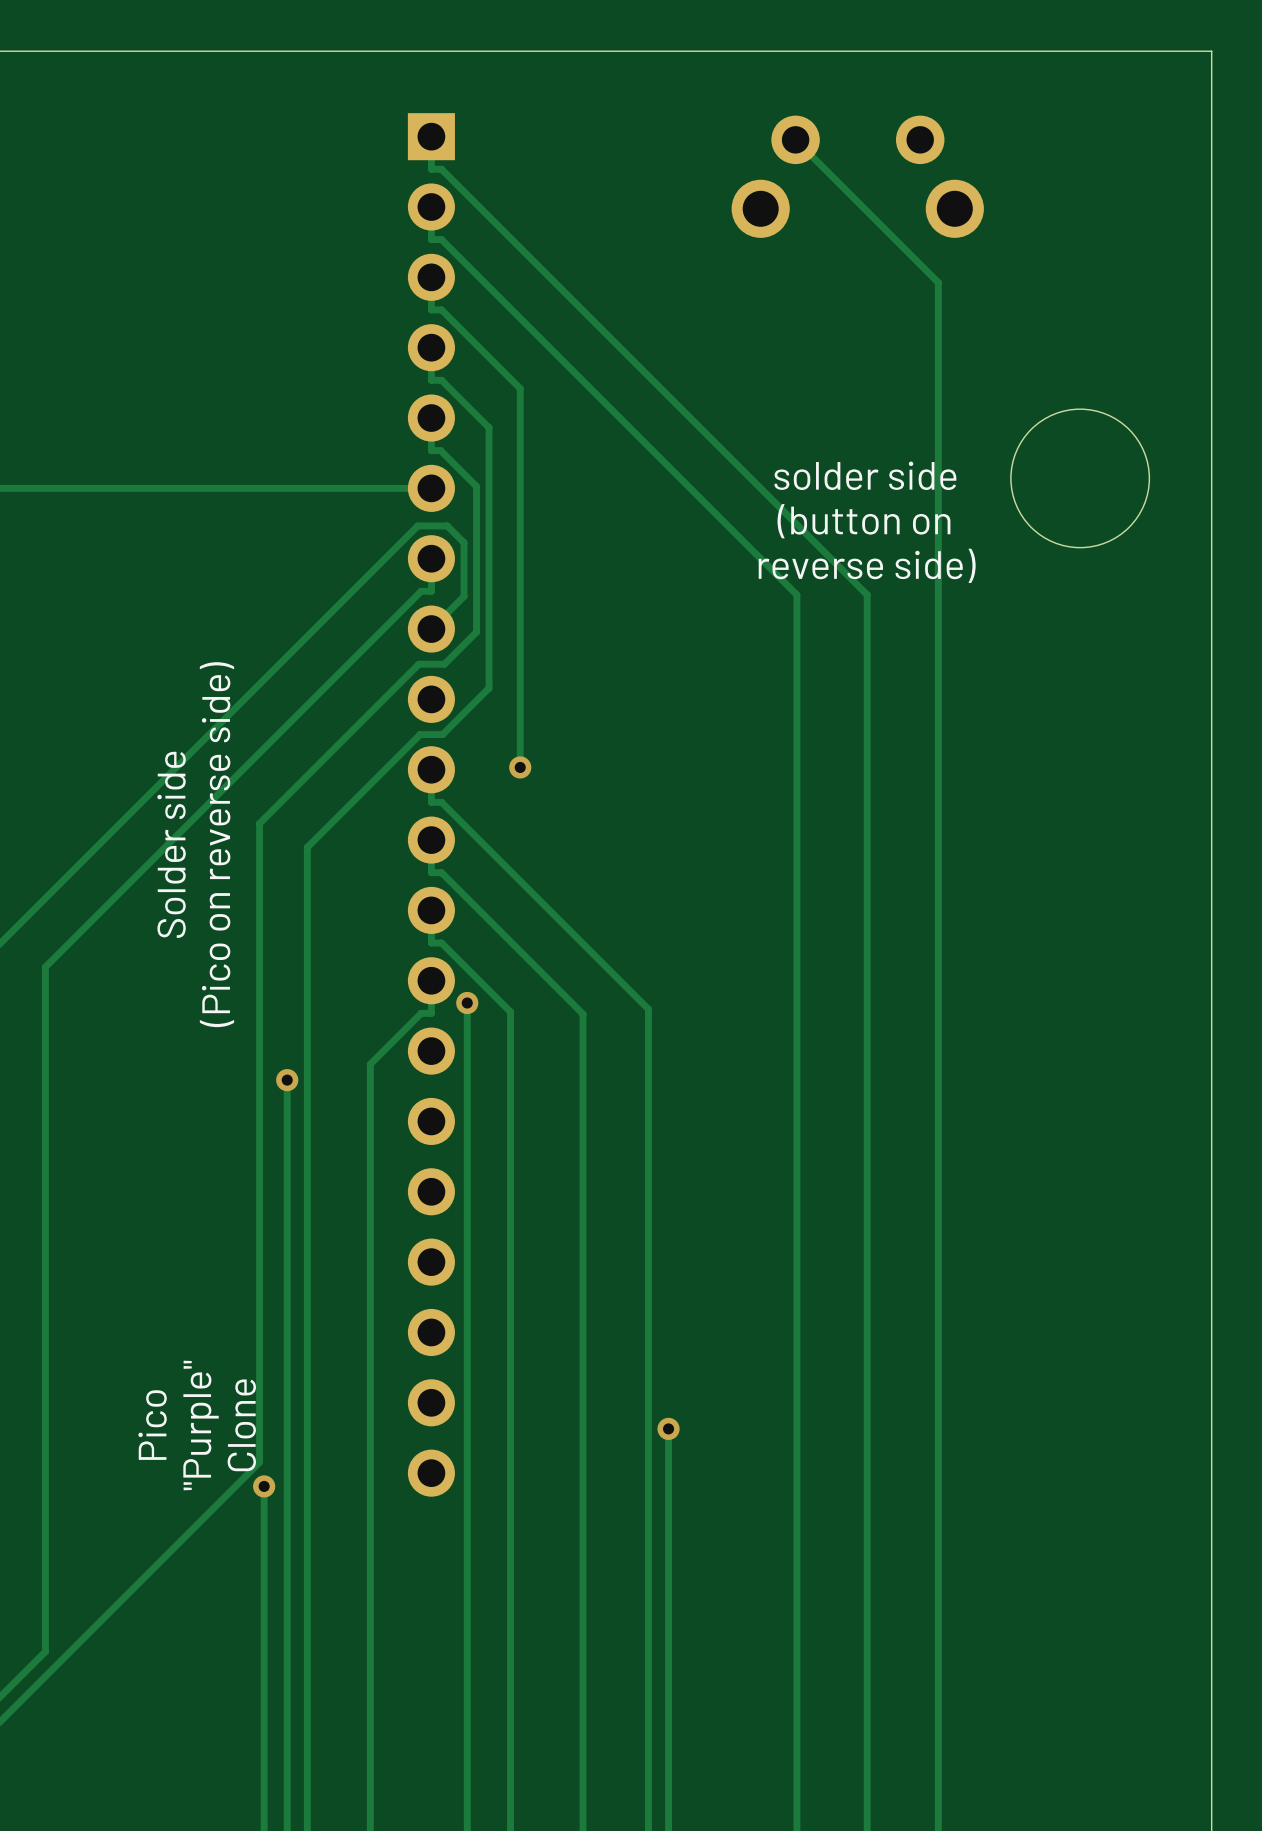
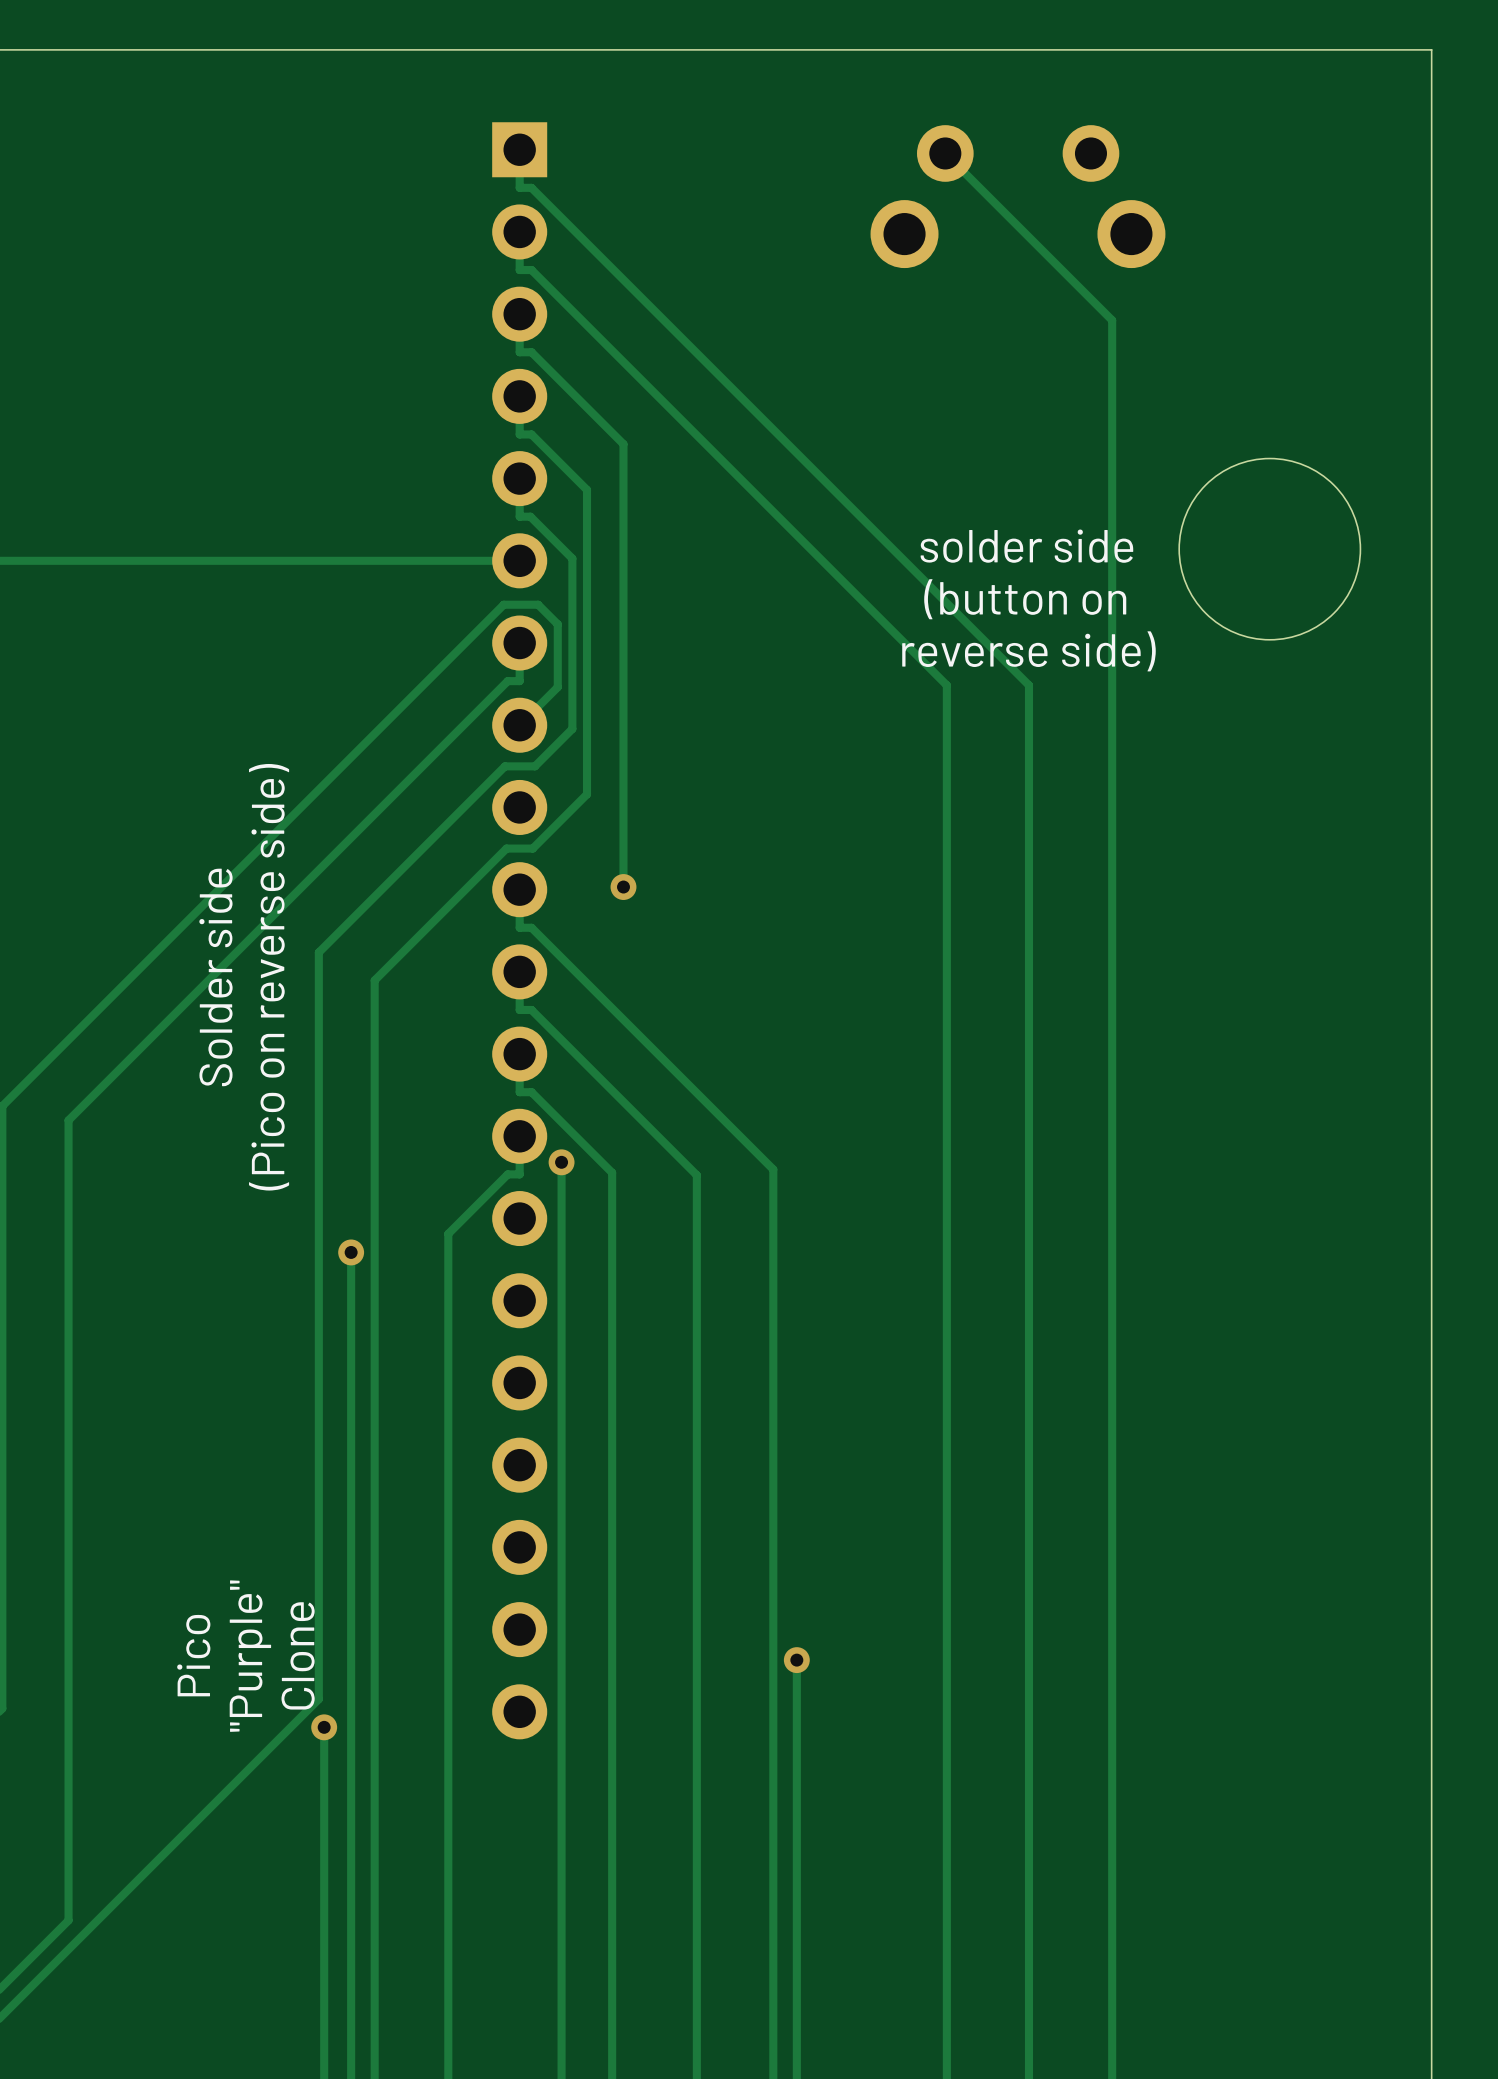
round board edge size: [1010, 408, 1151, 549] -> [1178, 457, 1362, 641]

